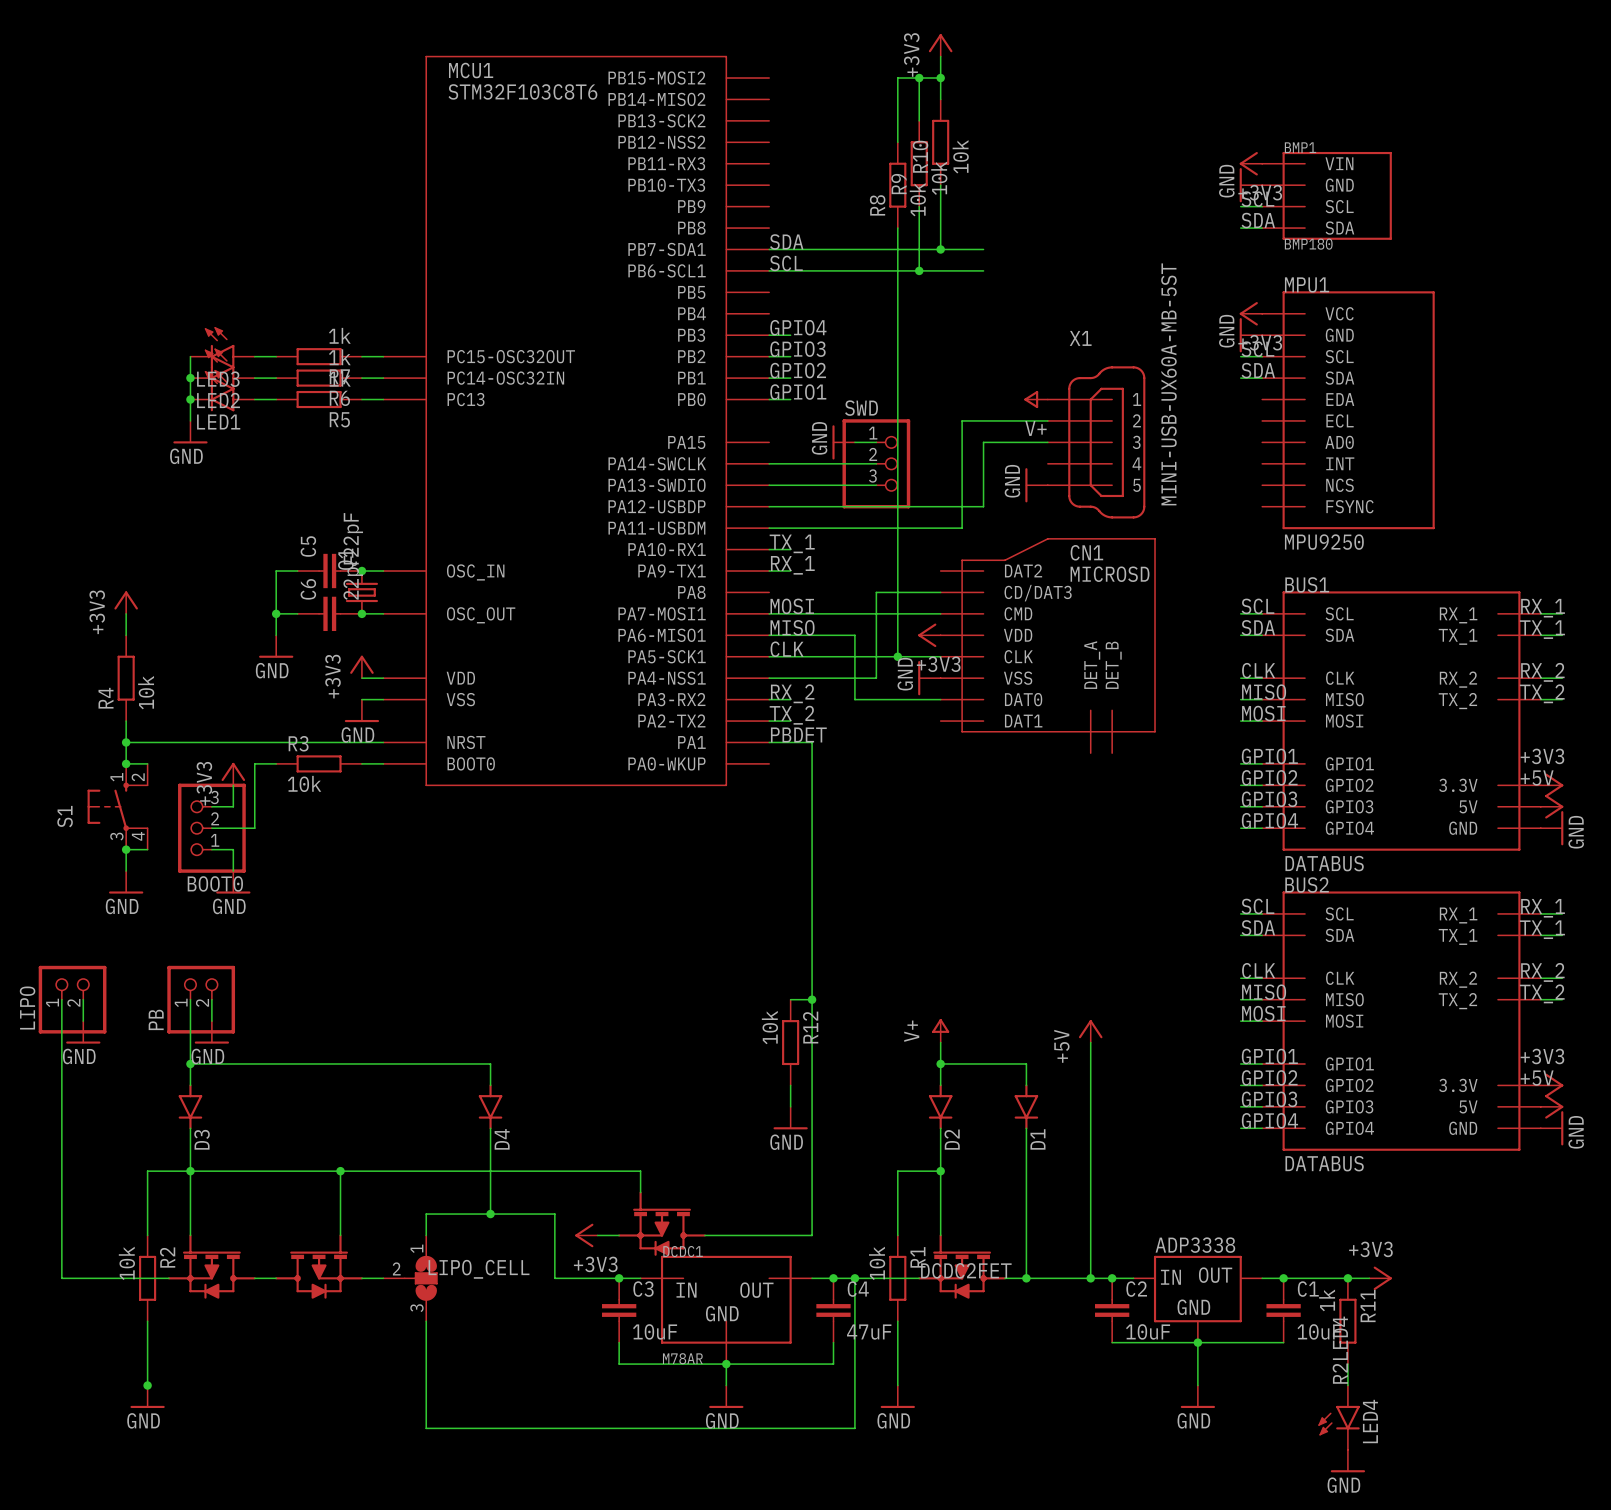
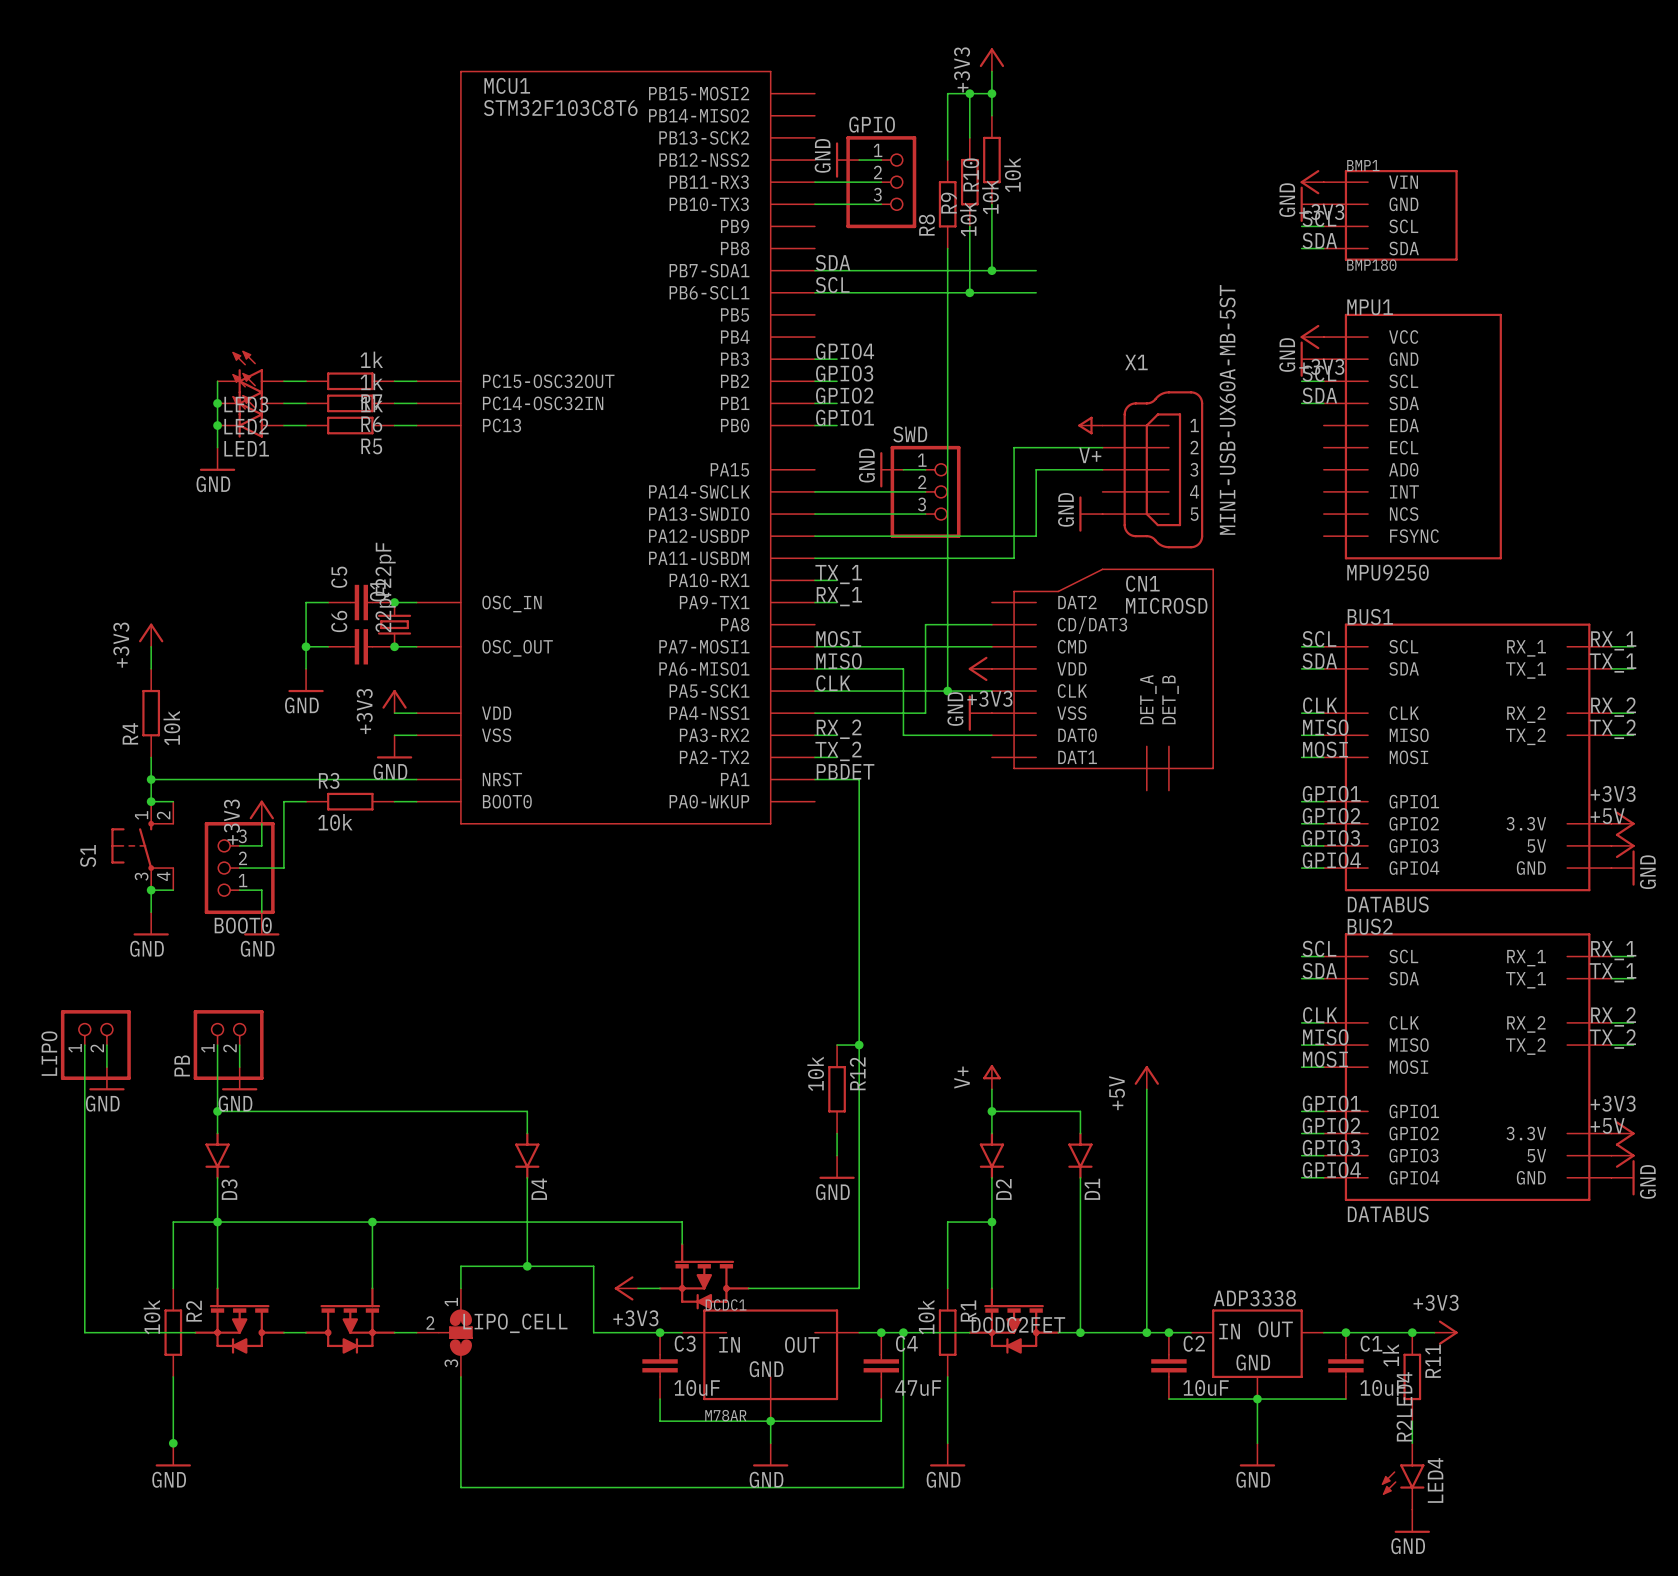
power symbol: none -> GND (847, 160)
wire: none -> (859, 160) (881, 160)
wire: none -> (814, 182) (881, 182)
GPIO: none -> (881, 182)
wire: none -> (814, 204) (881, 204)

